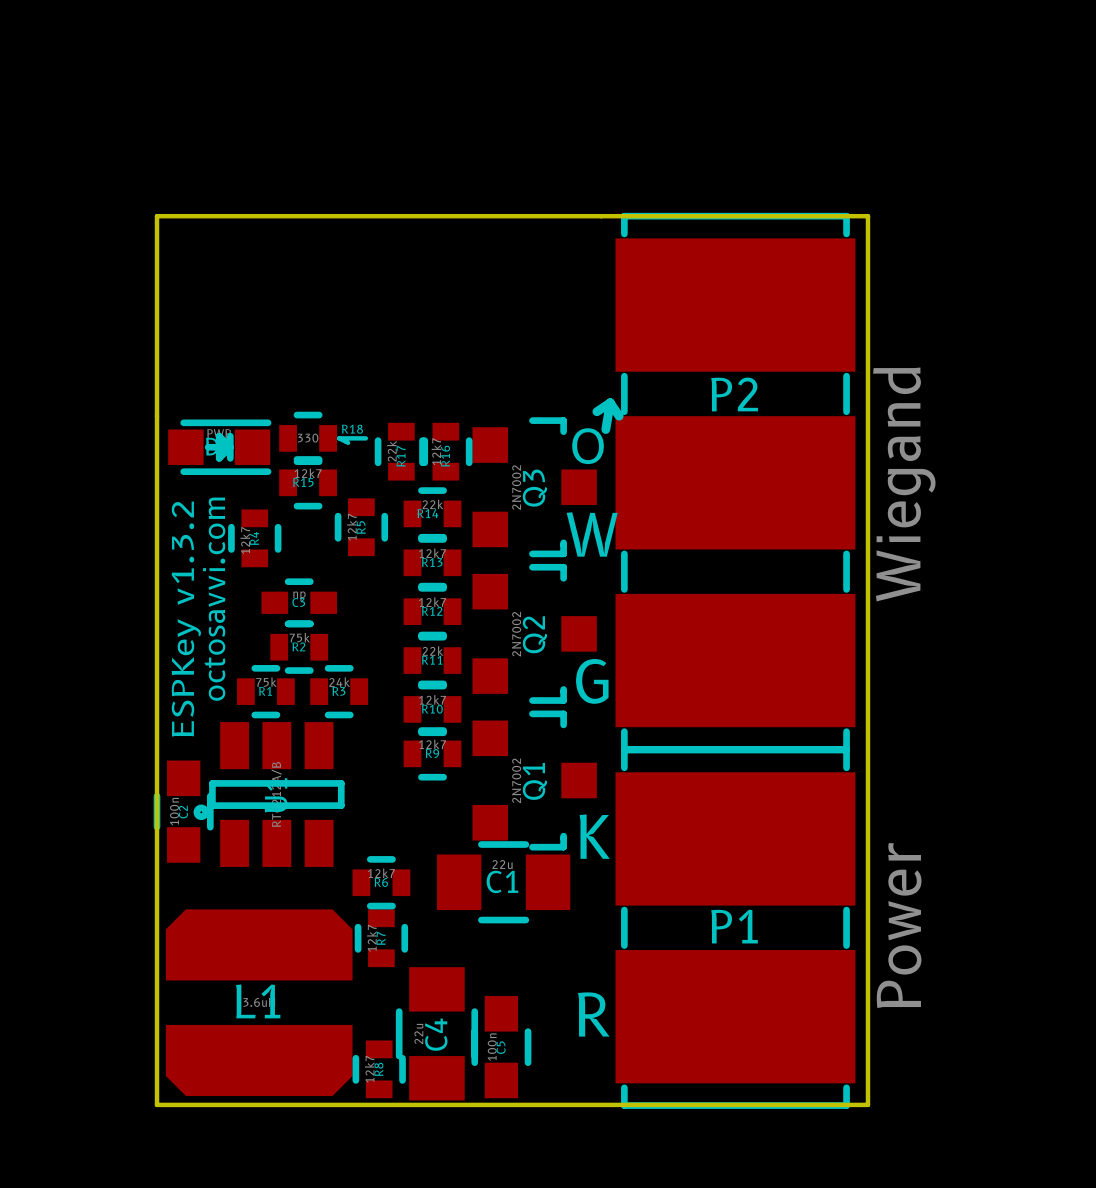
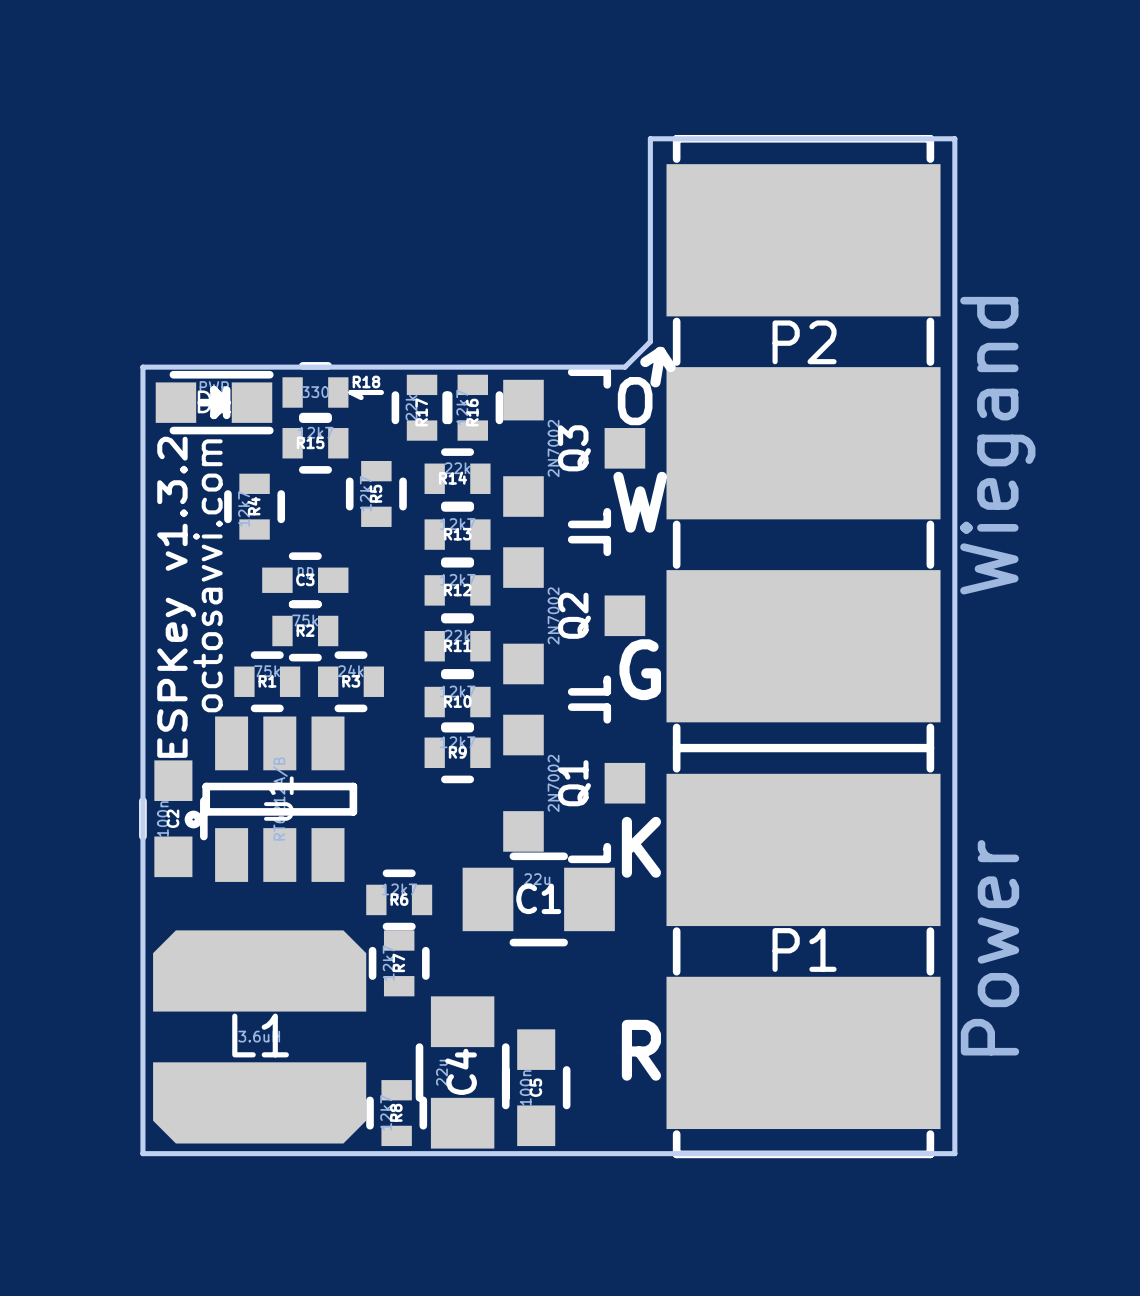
board edge: (601, 216) (157, 216) (157, 416) -> (650, 138) (650, 341) (625, 367) (142, 367)

